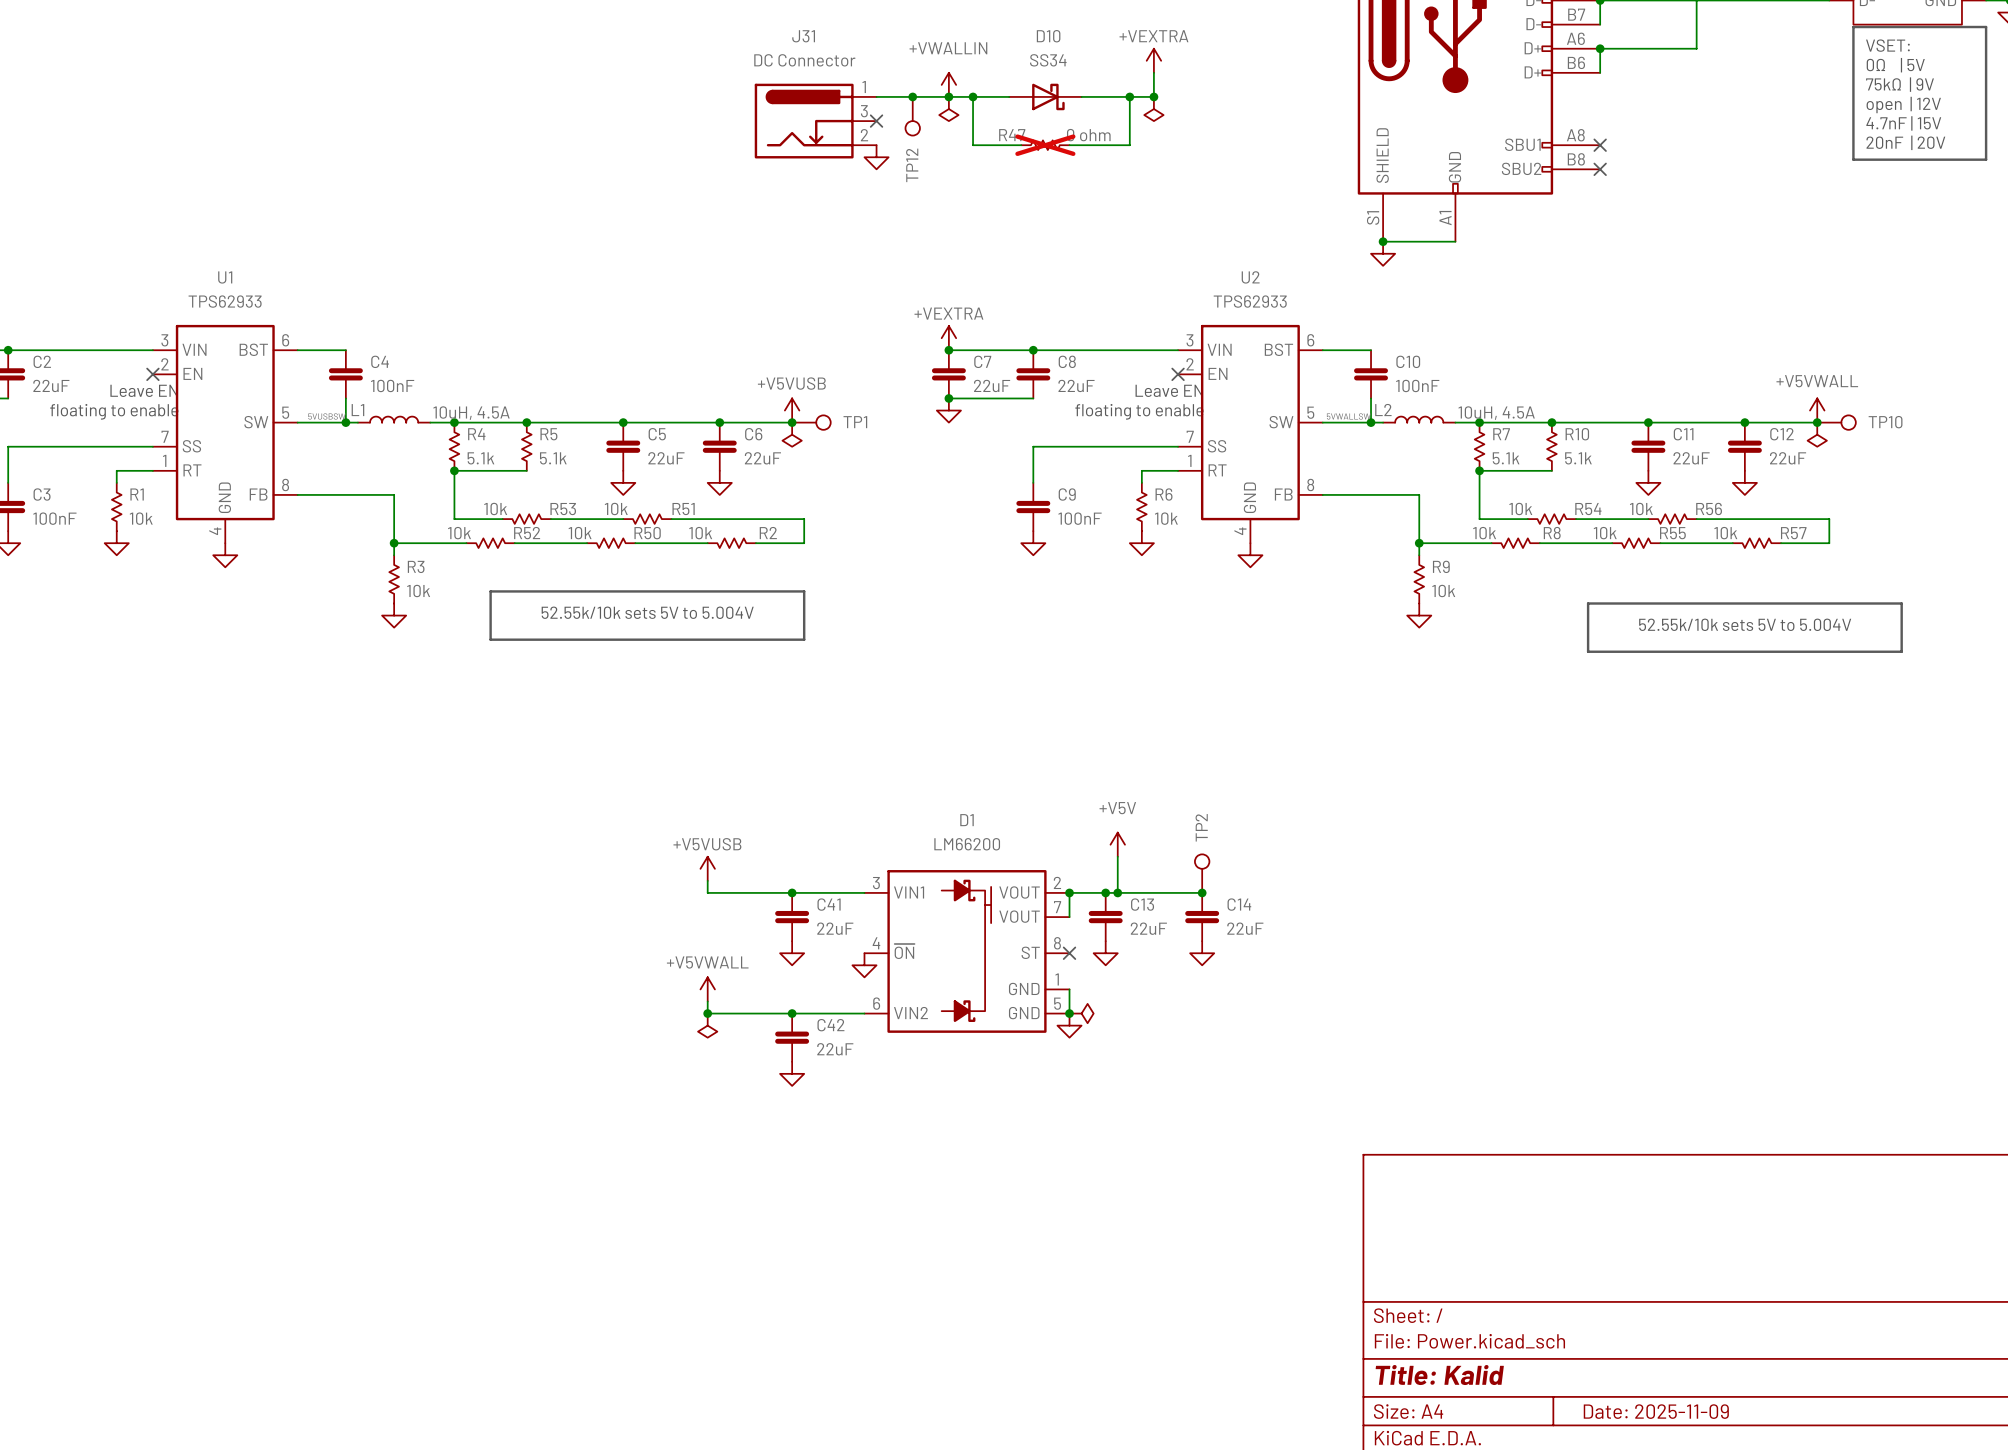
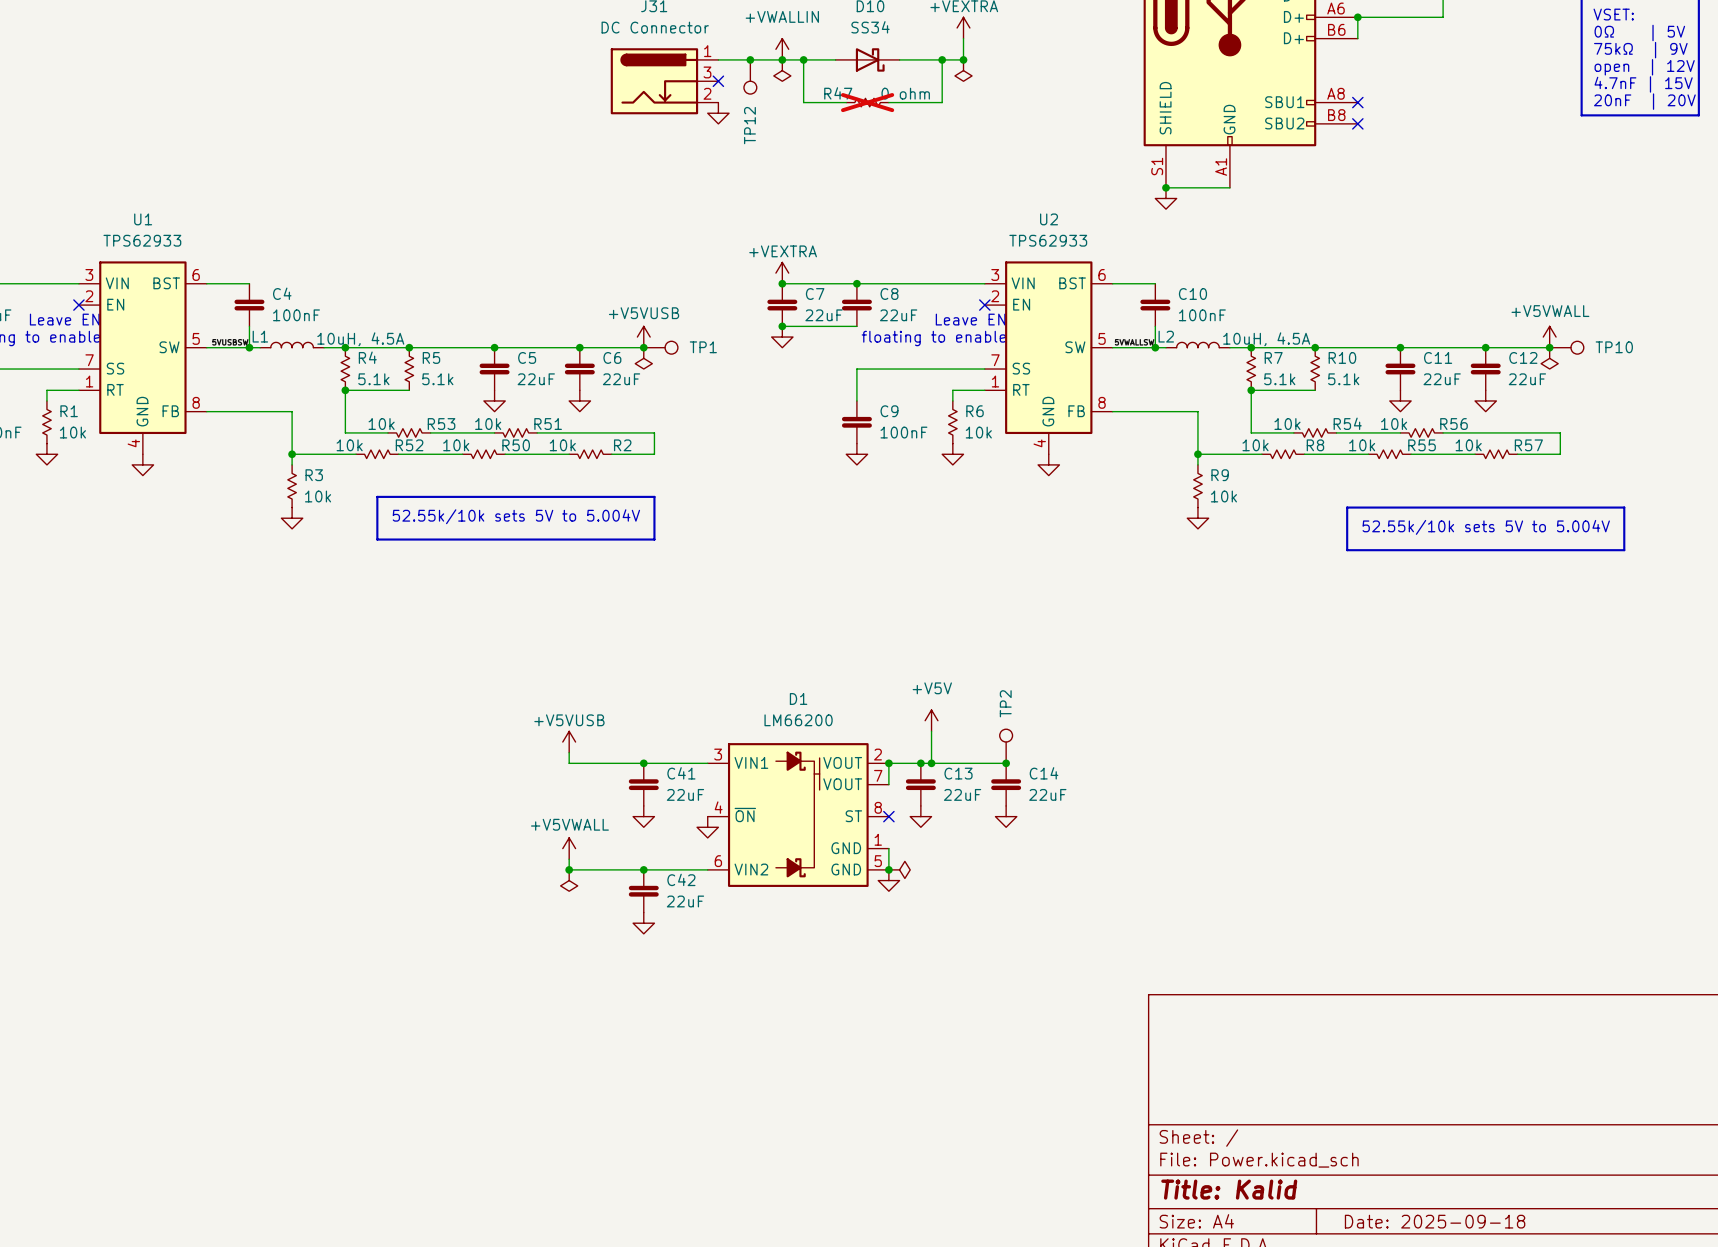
title block: Date: 2025-11-09 (1656, 1411) -> Date: 2025-09-18 (1435, 1221)

